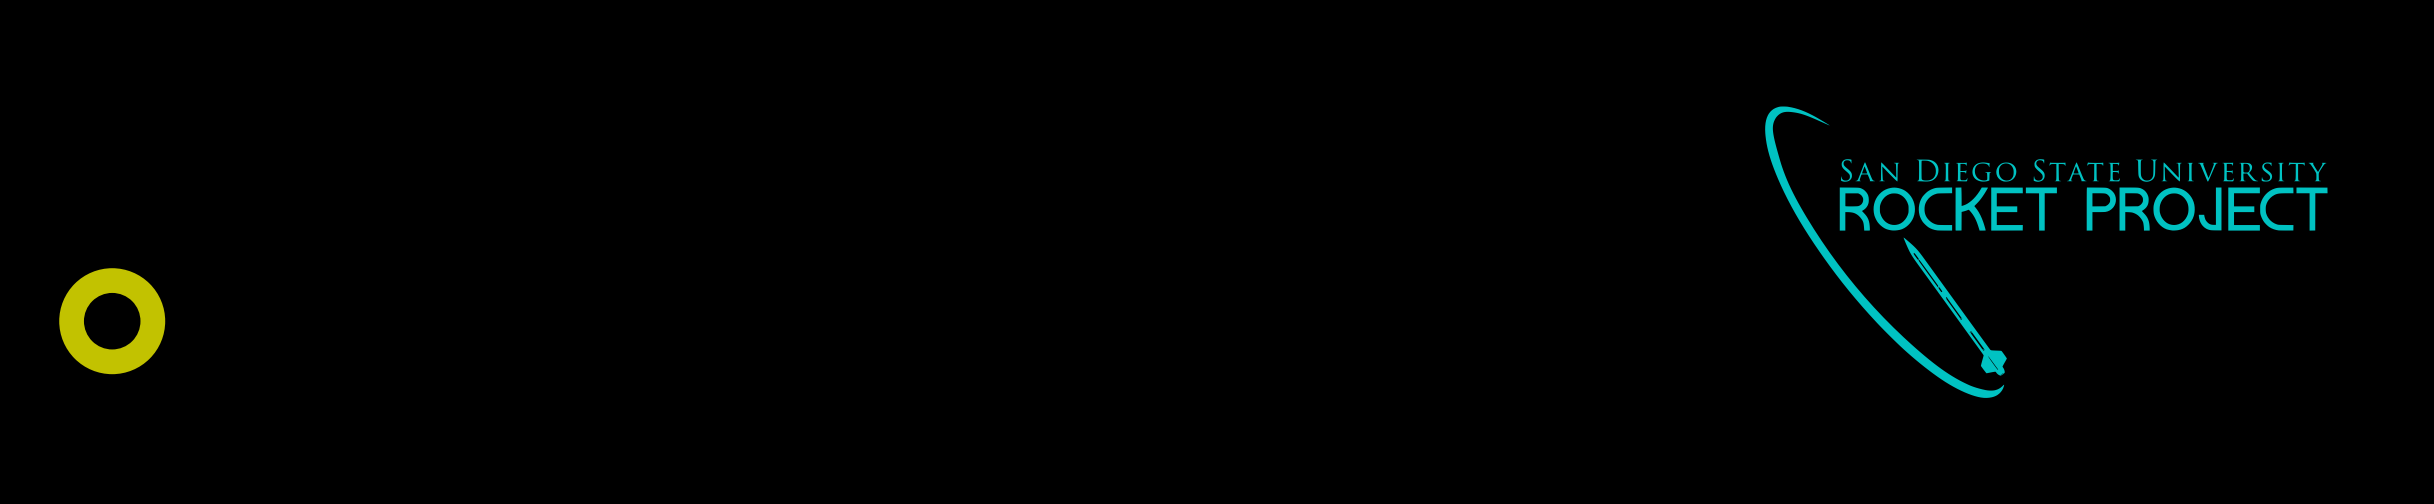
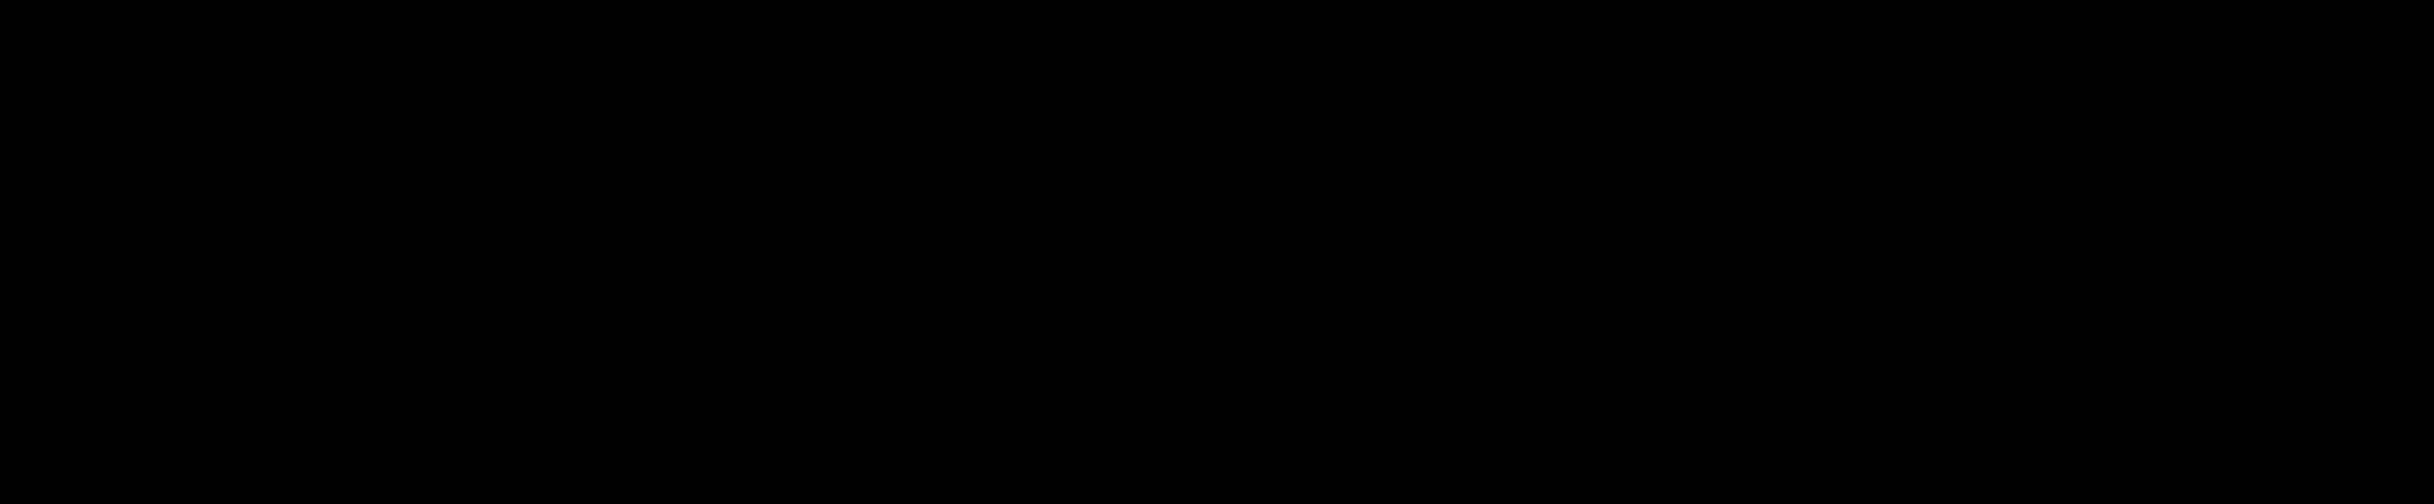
drawing: [1765, 106, 2328, 398] -> none
part: (112, 321) -> none

